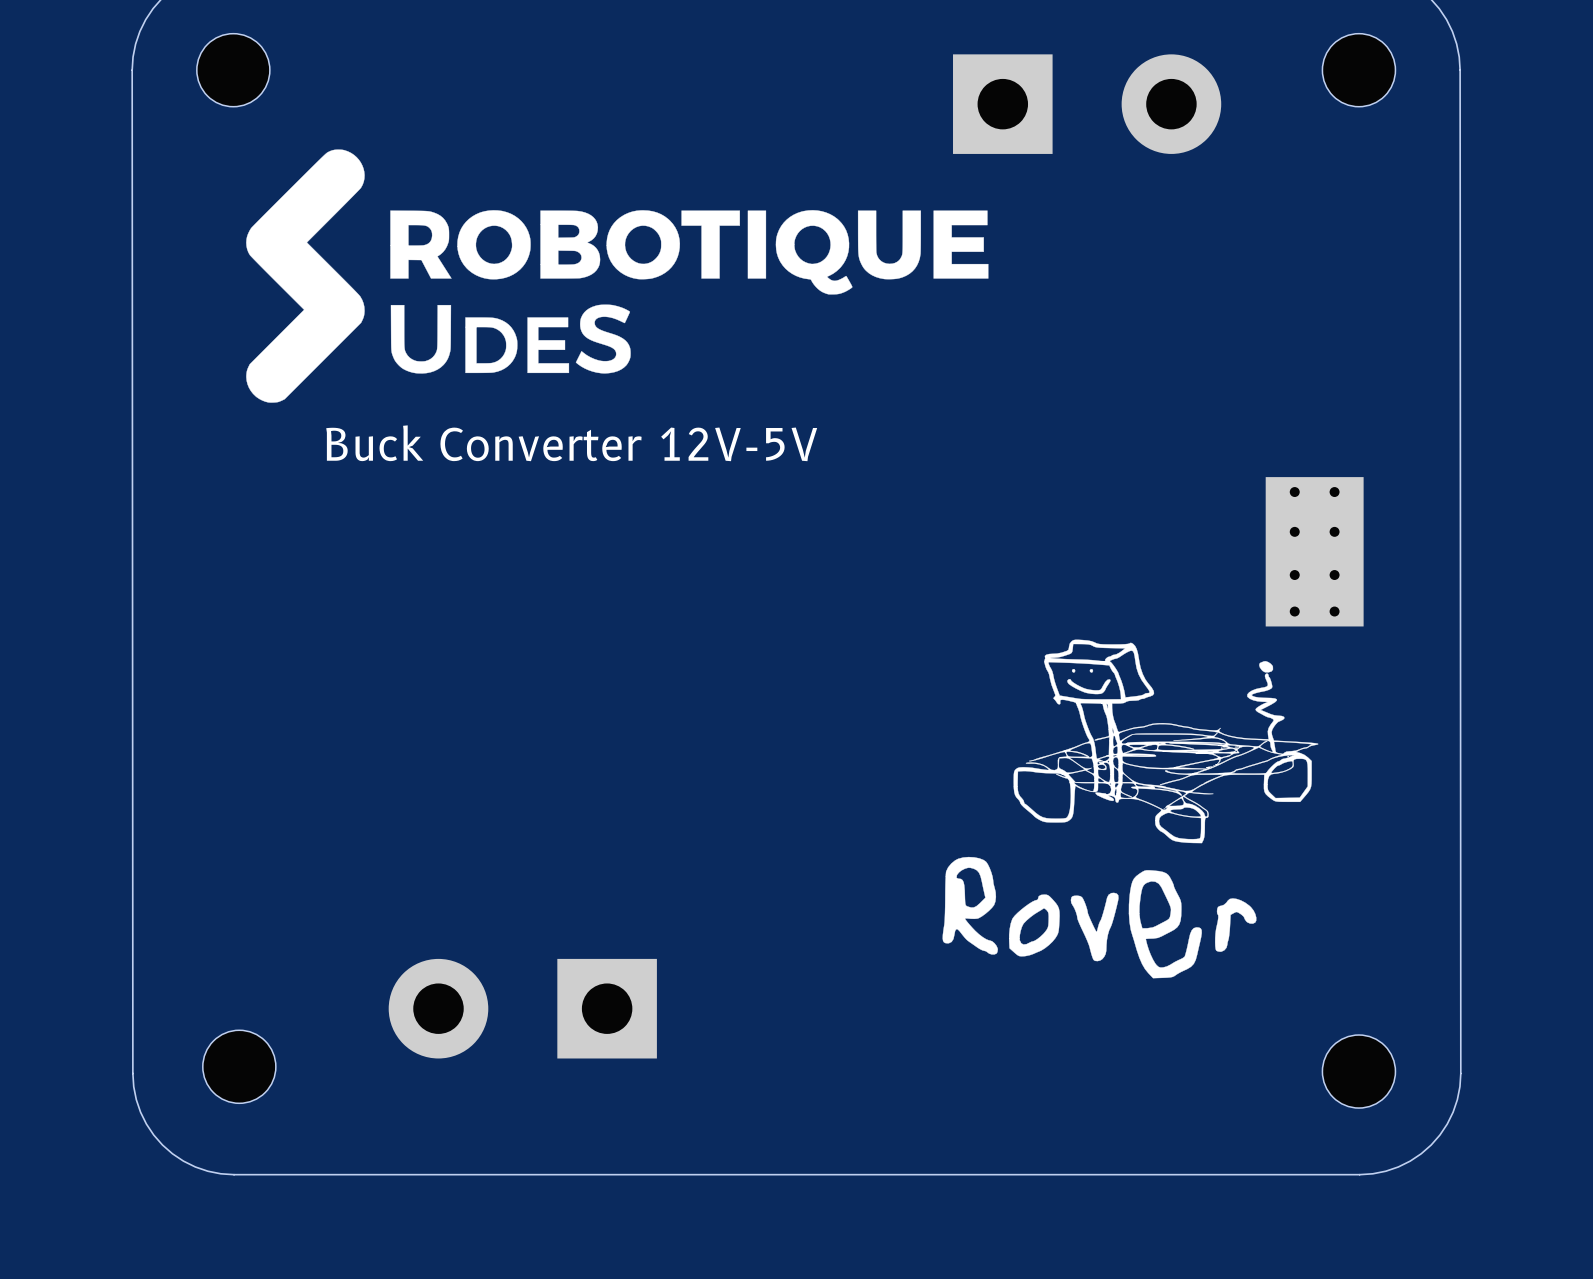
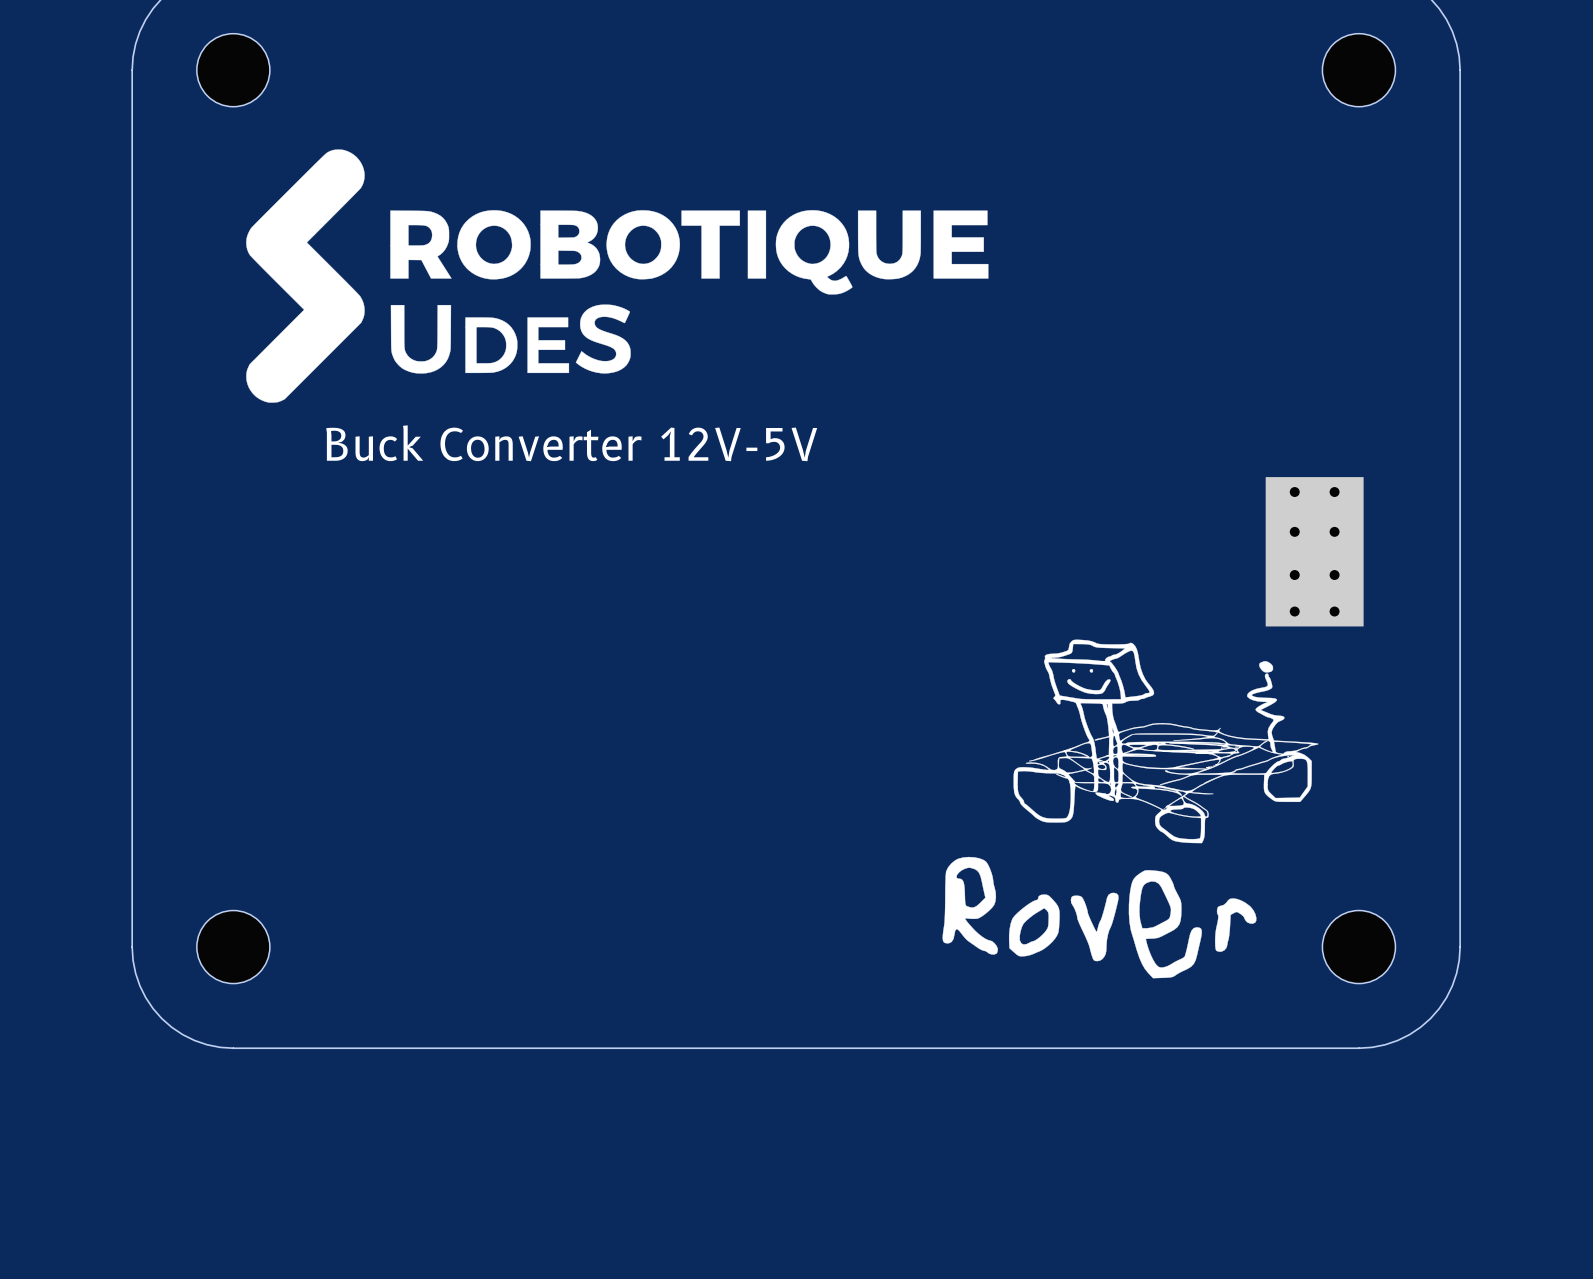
board edge: (1460, 70) (1459, 1086) (1453, 1112) (1439, 1135) (1431, 1145) (1410, 1161) (1398, 1166) (1372, 1173) (1359, 1174) (234, 1174) (220, 1173) (195, 1166) (183, 1161) (162, 1145) (153, 1135) (140, 1112) (136, 1099) (132, 1073) (132, 70) -> (1460, 70) (1460, 947) (1456, 973) (1446, 997) (1439, 1008) (1420, 1027) (1397, 1040) (1385, 1044) (1358, 1048) (233, 1048) (220, 1047) (194, 1040) (182, 1034) (161, 1018) (153, 1008) (139, 985) (133, 960) (132, 70)
part: (1087, 104) -> none
part: (522, 1008) -> none
part position: (239, 1066) -> (233, 947)
part position: (1358, 1071) -> (1358, 947)

